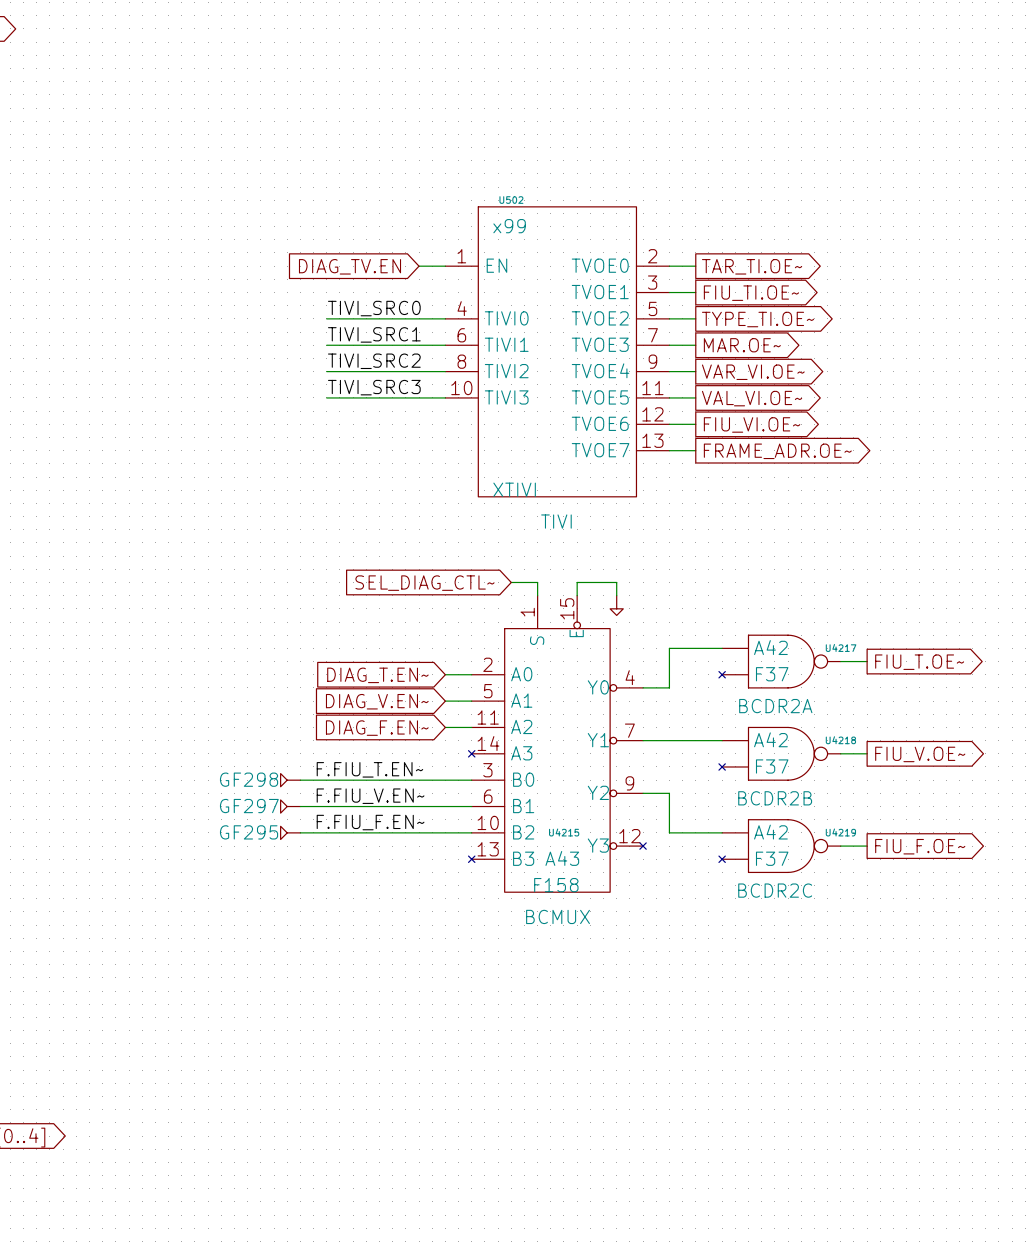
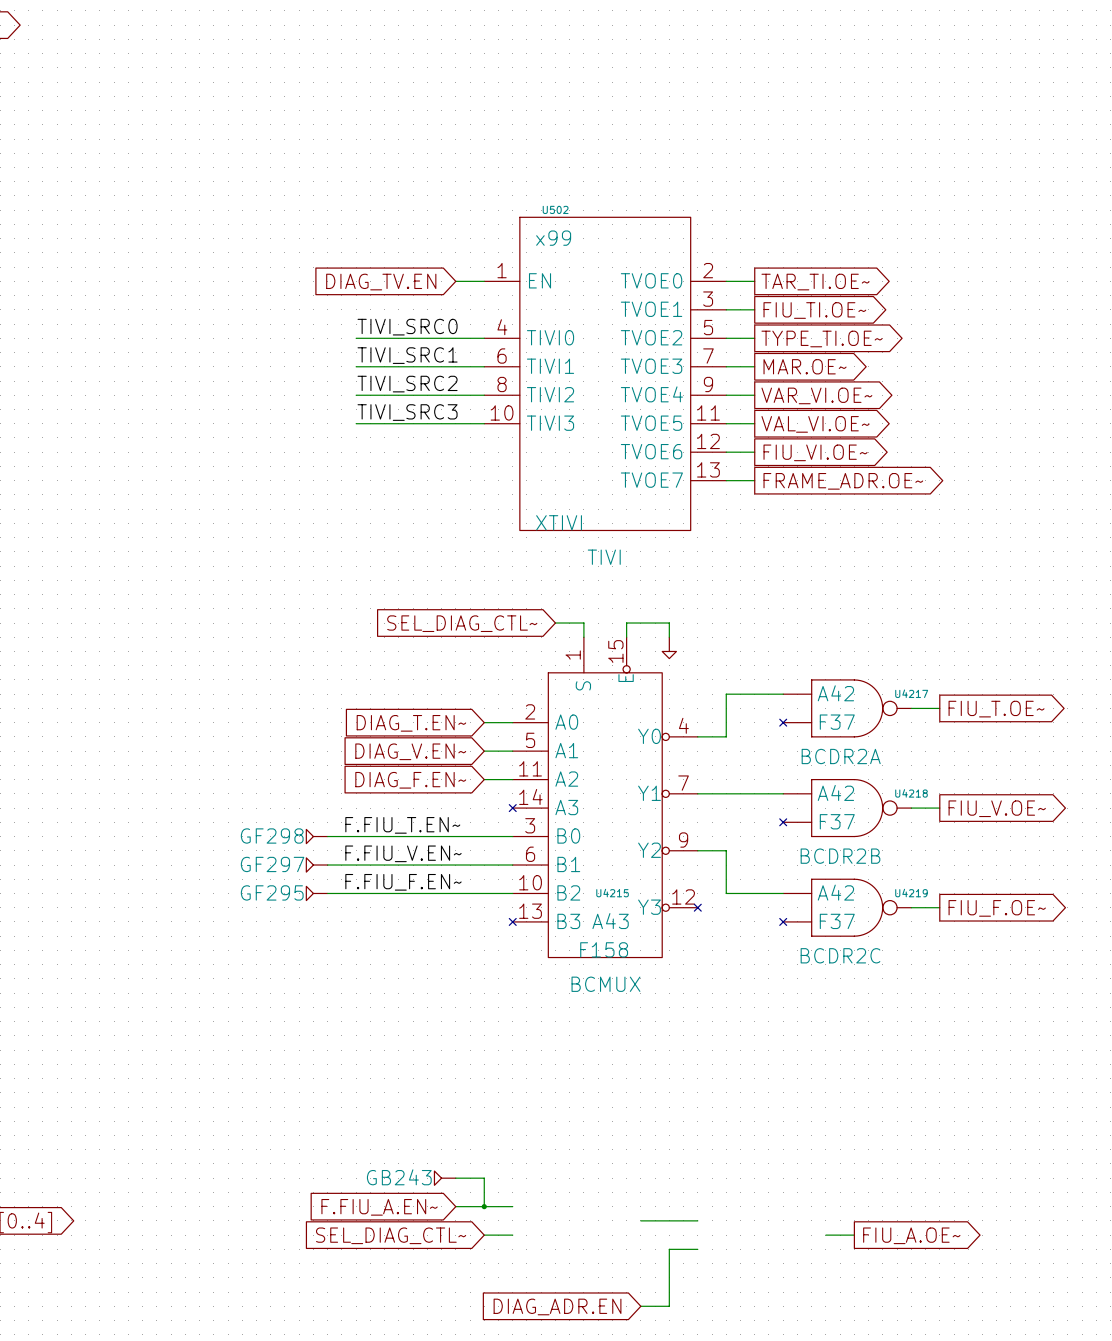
GB243: none -> (444, 1178)
wire: none -> (455, 1178) (484, 1178) (484, 1206)
wire: none -> (455, 1206) (512, 1206)
junction: none -> (484, 1206)
global label: none -> F.FIU_A.EN~ (379, 1207)
wire: none -> (640, 1220) (697, 1220)
global label: none -> SEL_DIAG_CTL~ (391, 1235)
wire: none -> (484, 1235) (512, 1235)
wire: none -> (825, 1235) (854, 1235)
global label: none -> FIU_A.OE~ (911, 1235)
wire: none -> (697, 1249) (669, 1249) (669, 1306) (640, 1306)
global label: none -> DIAG_ADR.EN (557, 1306)

